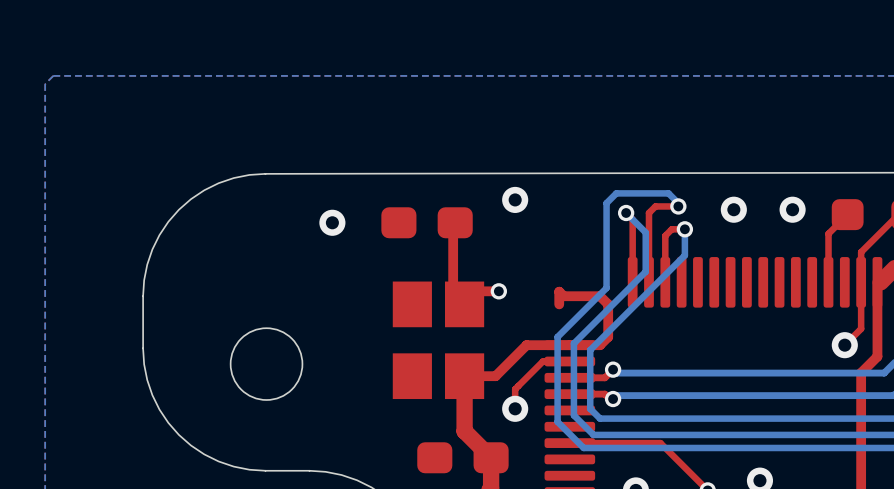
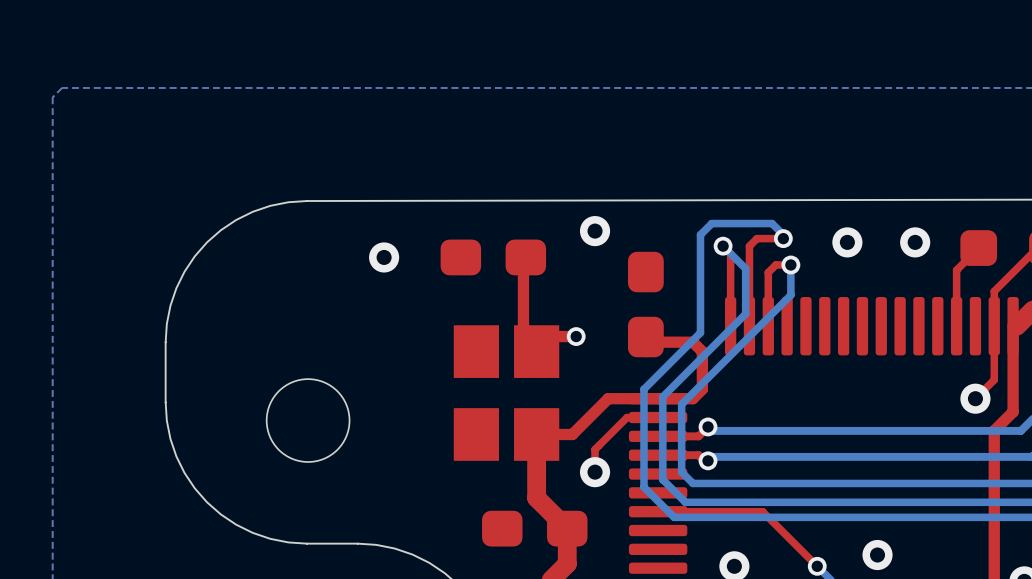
part: none -> (645, 304)

